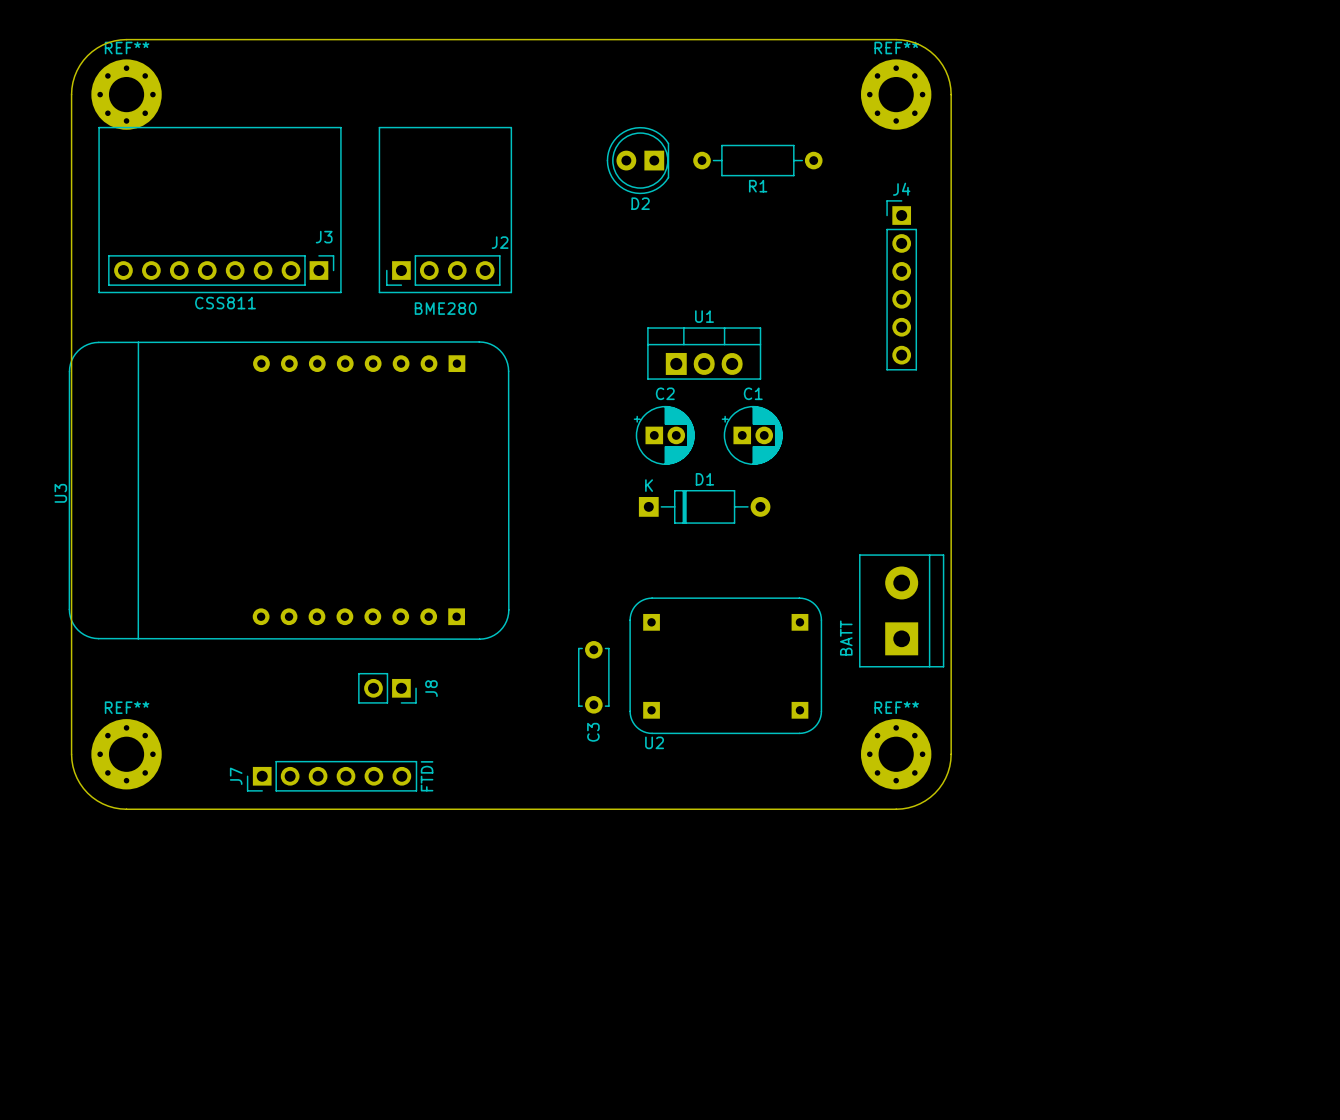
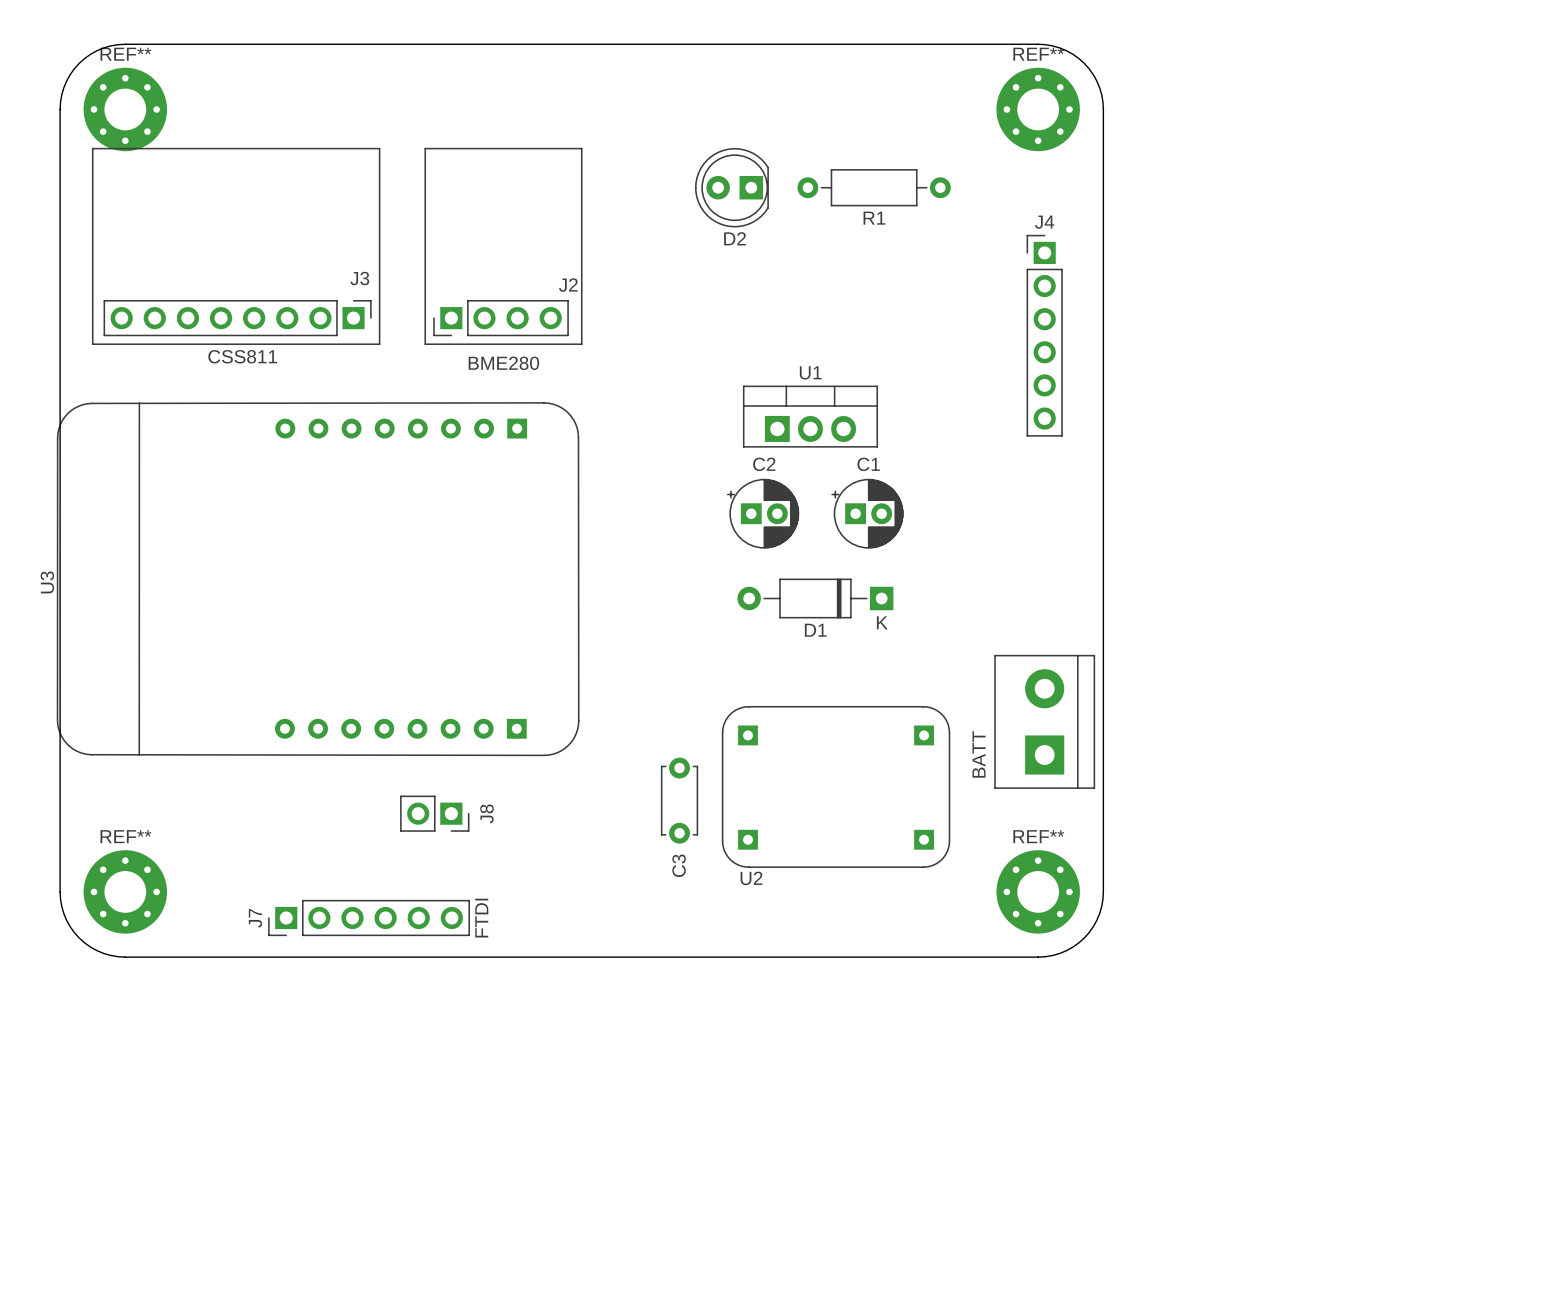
D1 rotation: 0° (704, 506) -> 180° (815, 598)

